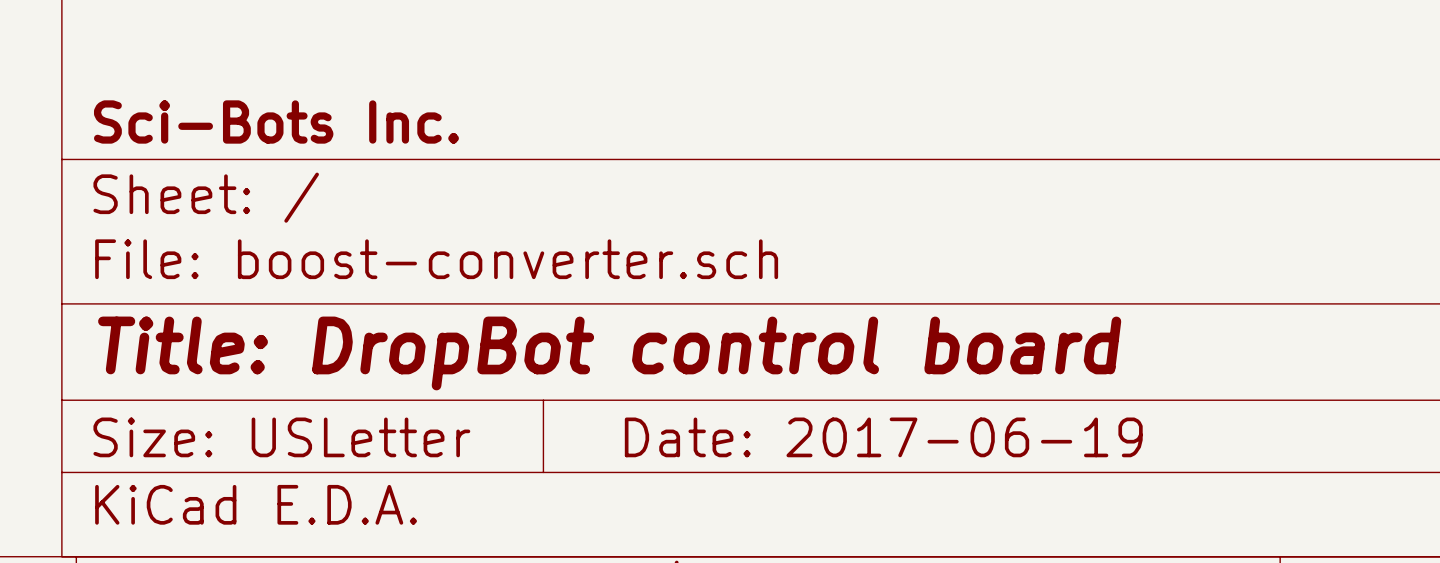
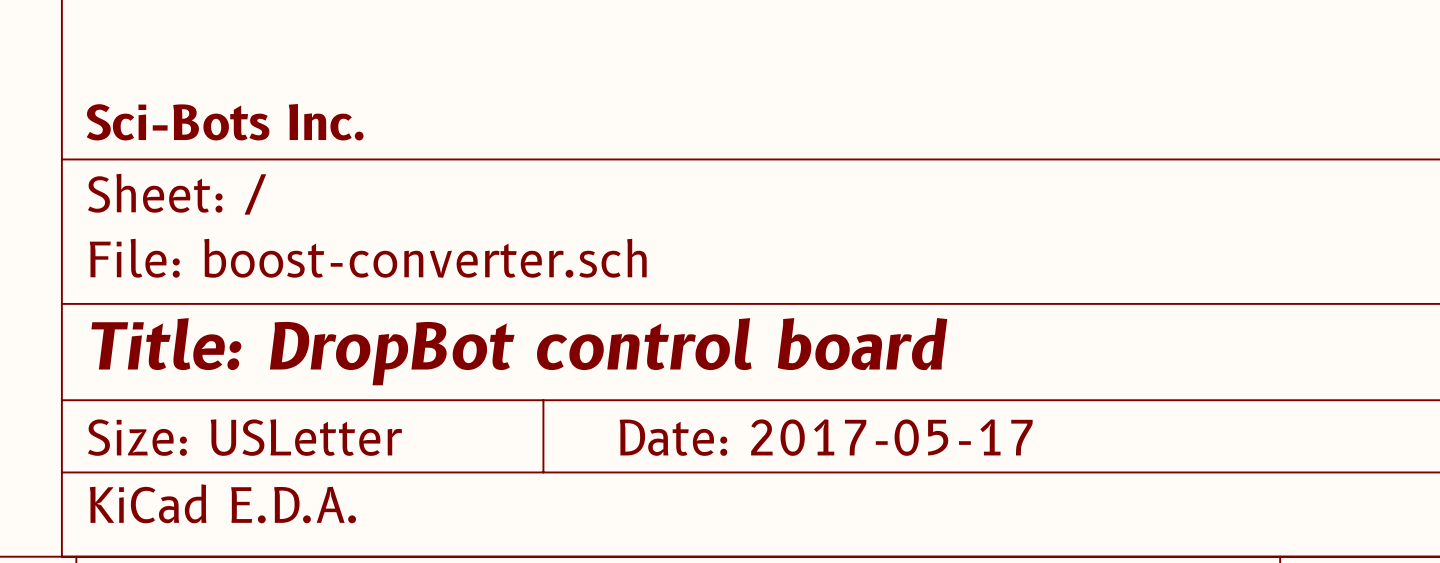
title block: Date: 2017-06-19 (883, 437) -> Date: 2017-05-17 (826, 437)

